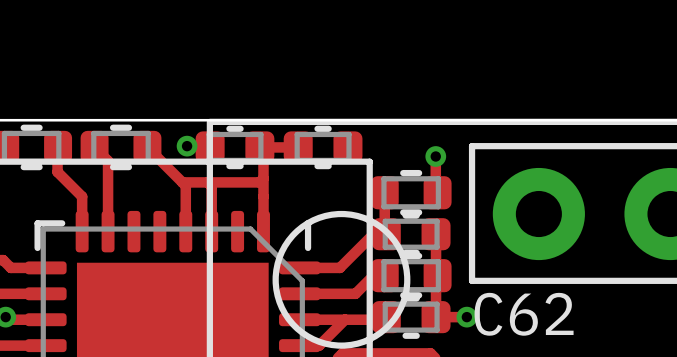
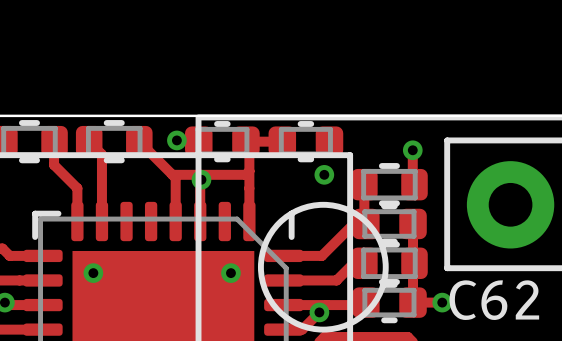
via: none -> (324, 174)
via: none -> (201, 179)
via: none -> (93, 273)
via: none -> (230, 273)
via: none -> (319, 312)

